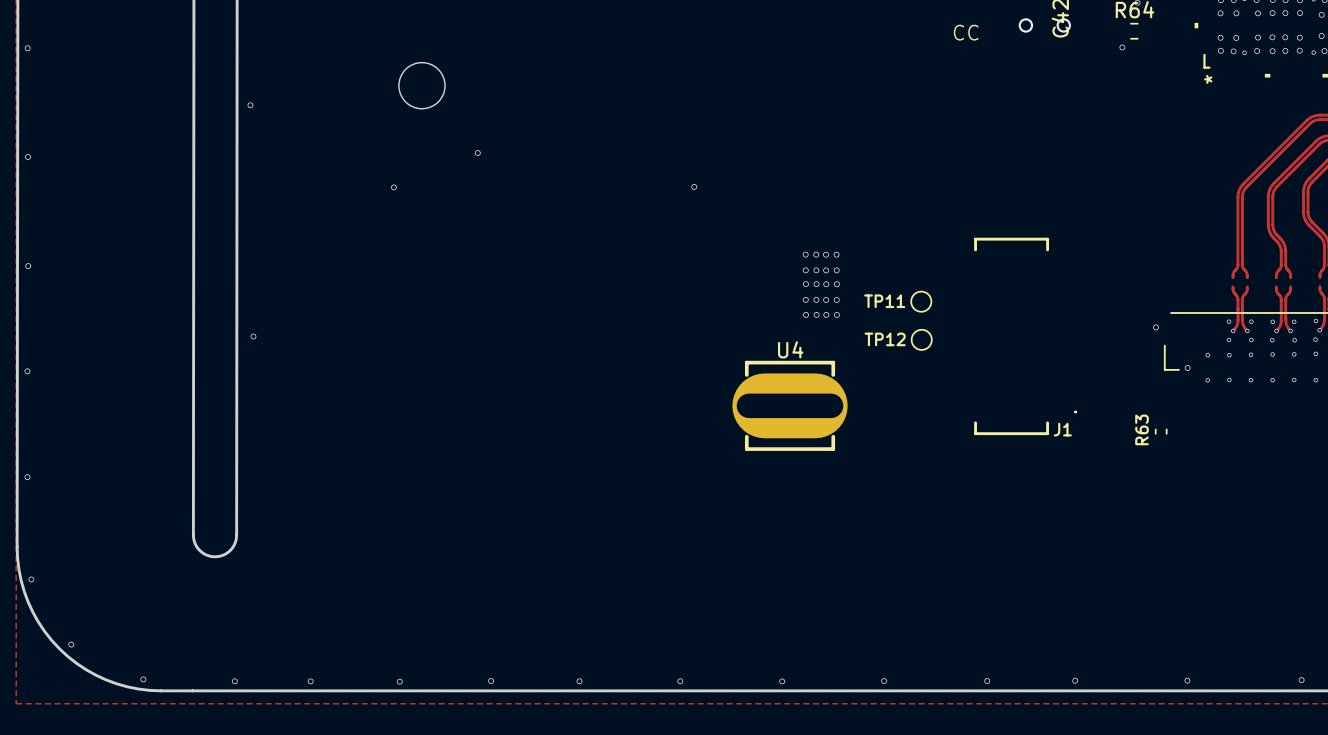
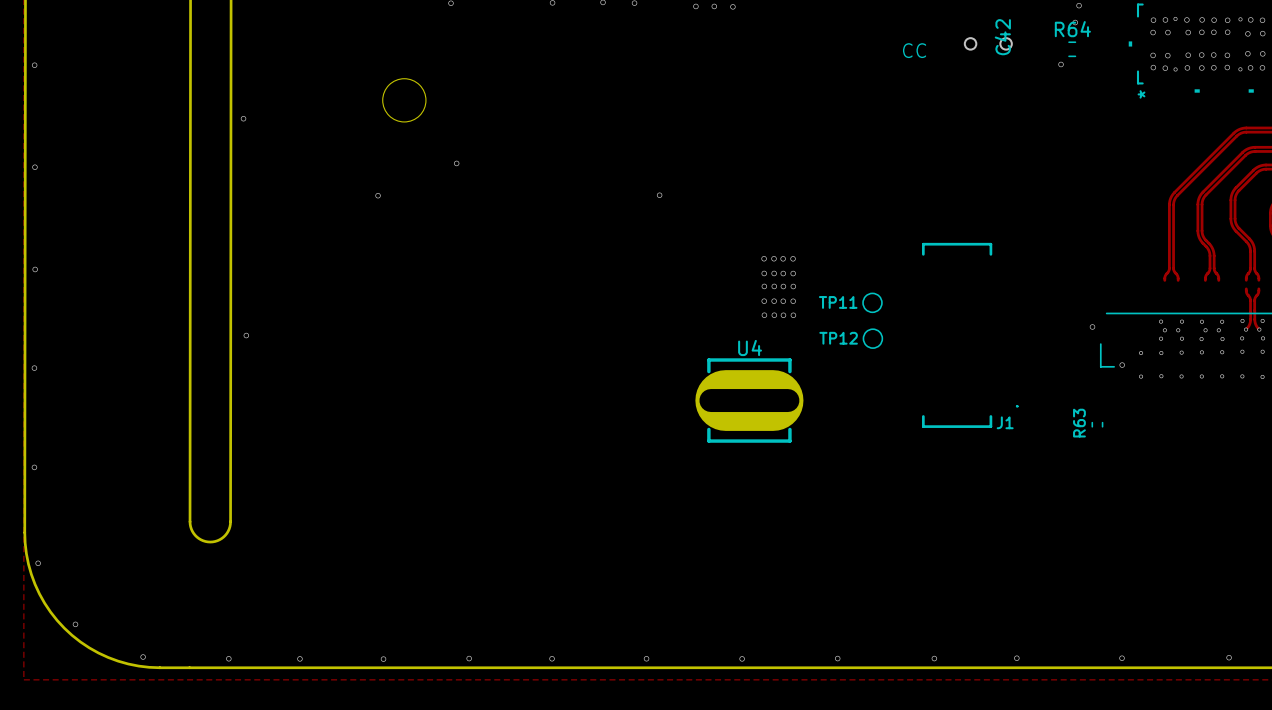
track: (1233, 286) (1237, 298) (1238, 320) (1233, 330) -> none
track: (1247, 286) (1242, 298) (1242, 307) -> none
track: (1276, 286) (1281, 298) (1281, 319) -> none
track: (1290, 286) (1285, 298) (1285, 318) -> none
track: (1242, 307) (1242, 322) (1247, 330) -> none
track: (1285, 318) (1286, 325) (1290, 330) -> none
track: (1281, 320) (1276, 330) -> none

